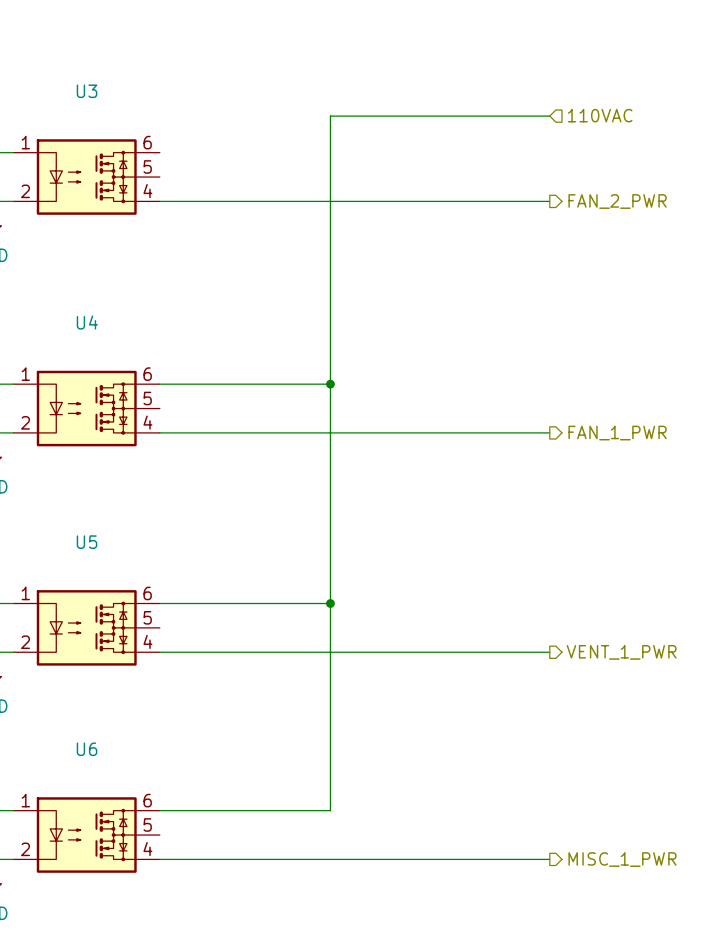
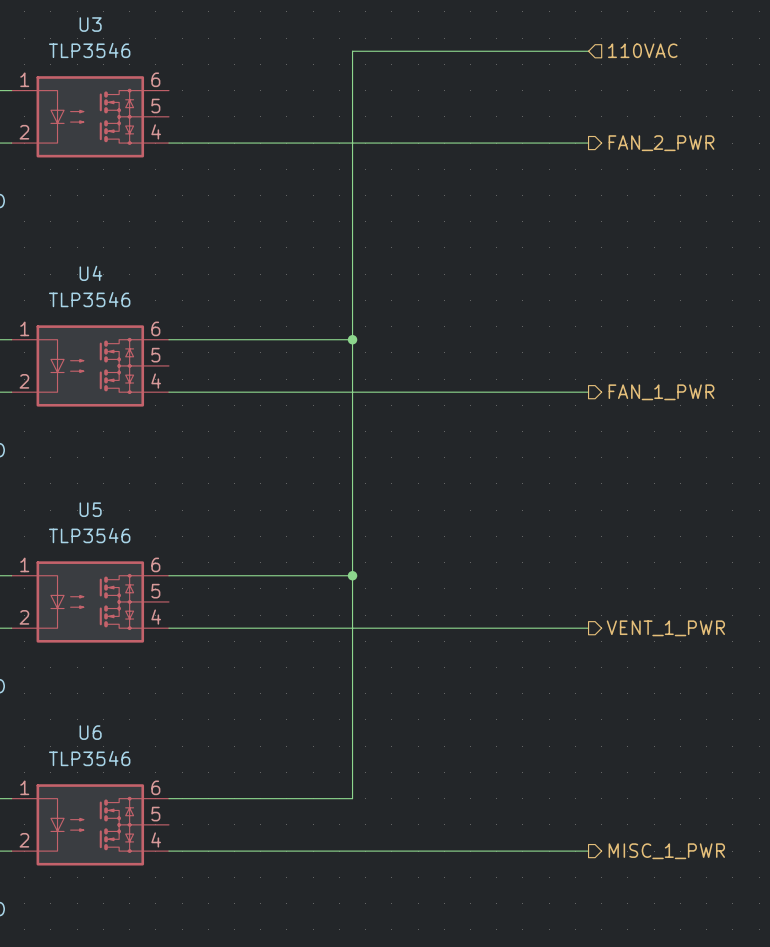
U3 value: none -> TLP3546 (89, 50)
U4 value: none -> TLP3546 (89, 299)
U5 value: none -> TLP3546 (89, 535)
U6 value: none -> TLP3546 (89, 758)

